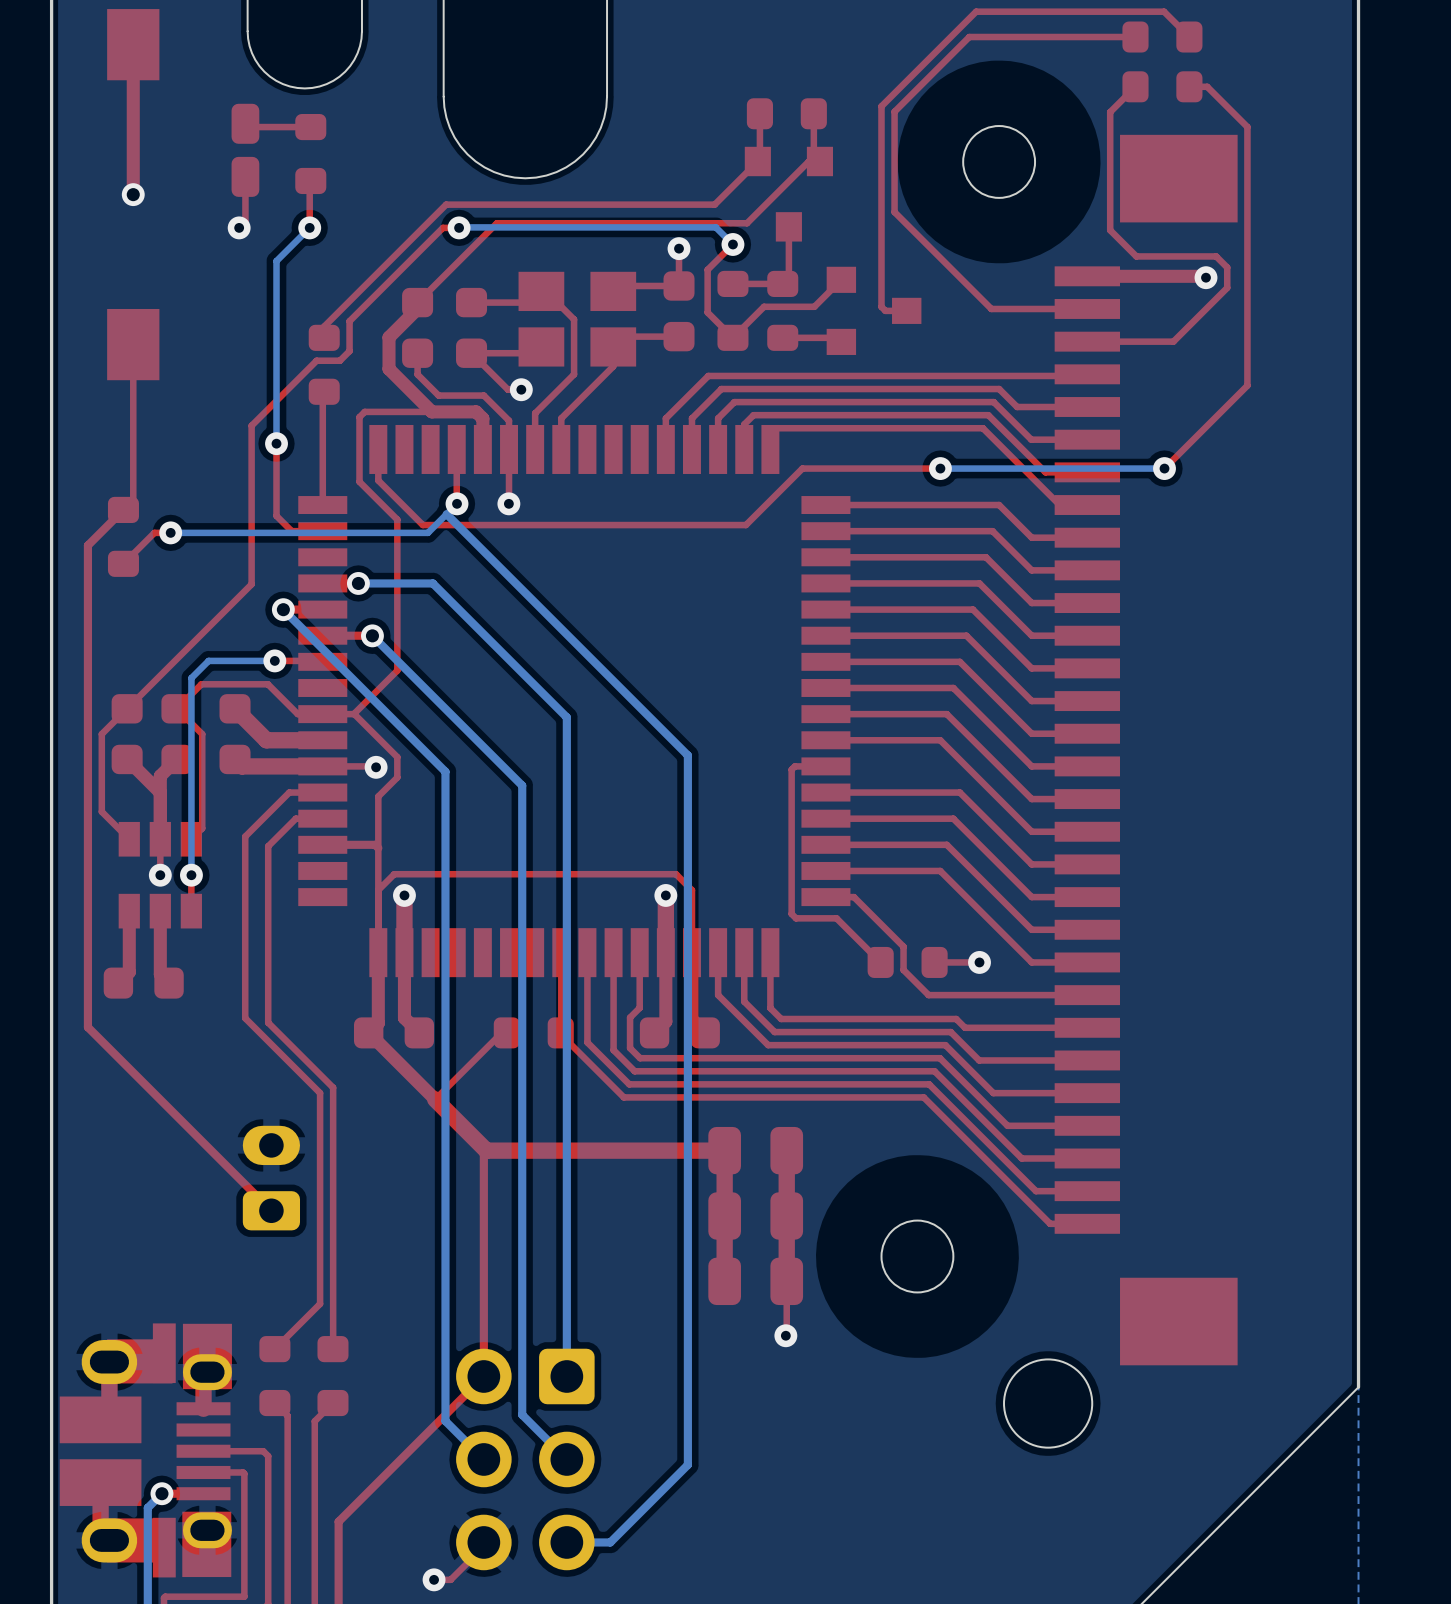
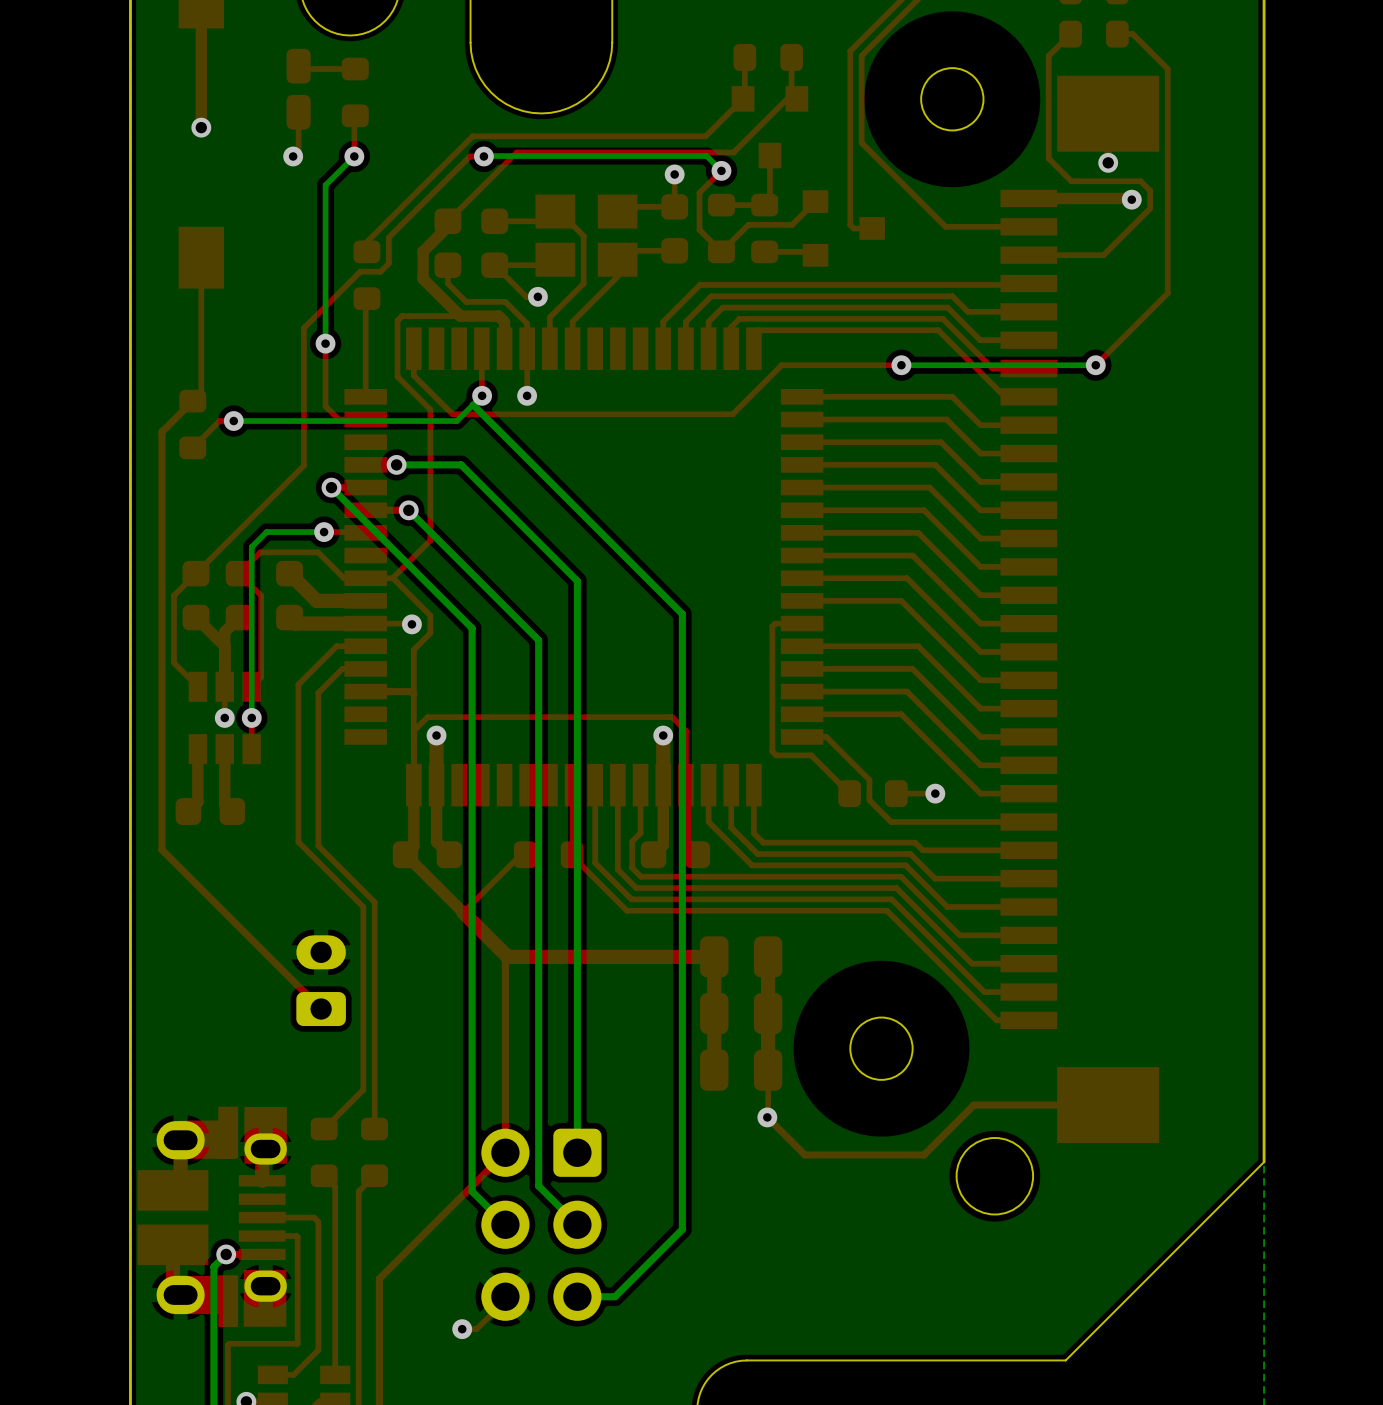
via: none -> (1108, 162)
top track: none -> (1108, 1105) (973, 1105) (923, 1154) (804, 1154) (767, 1117)

